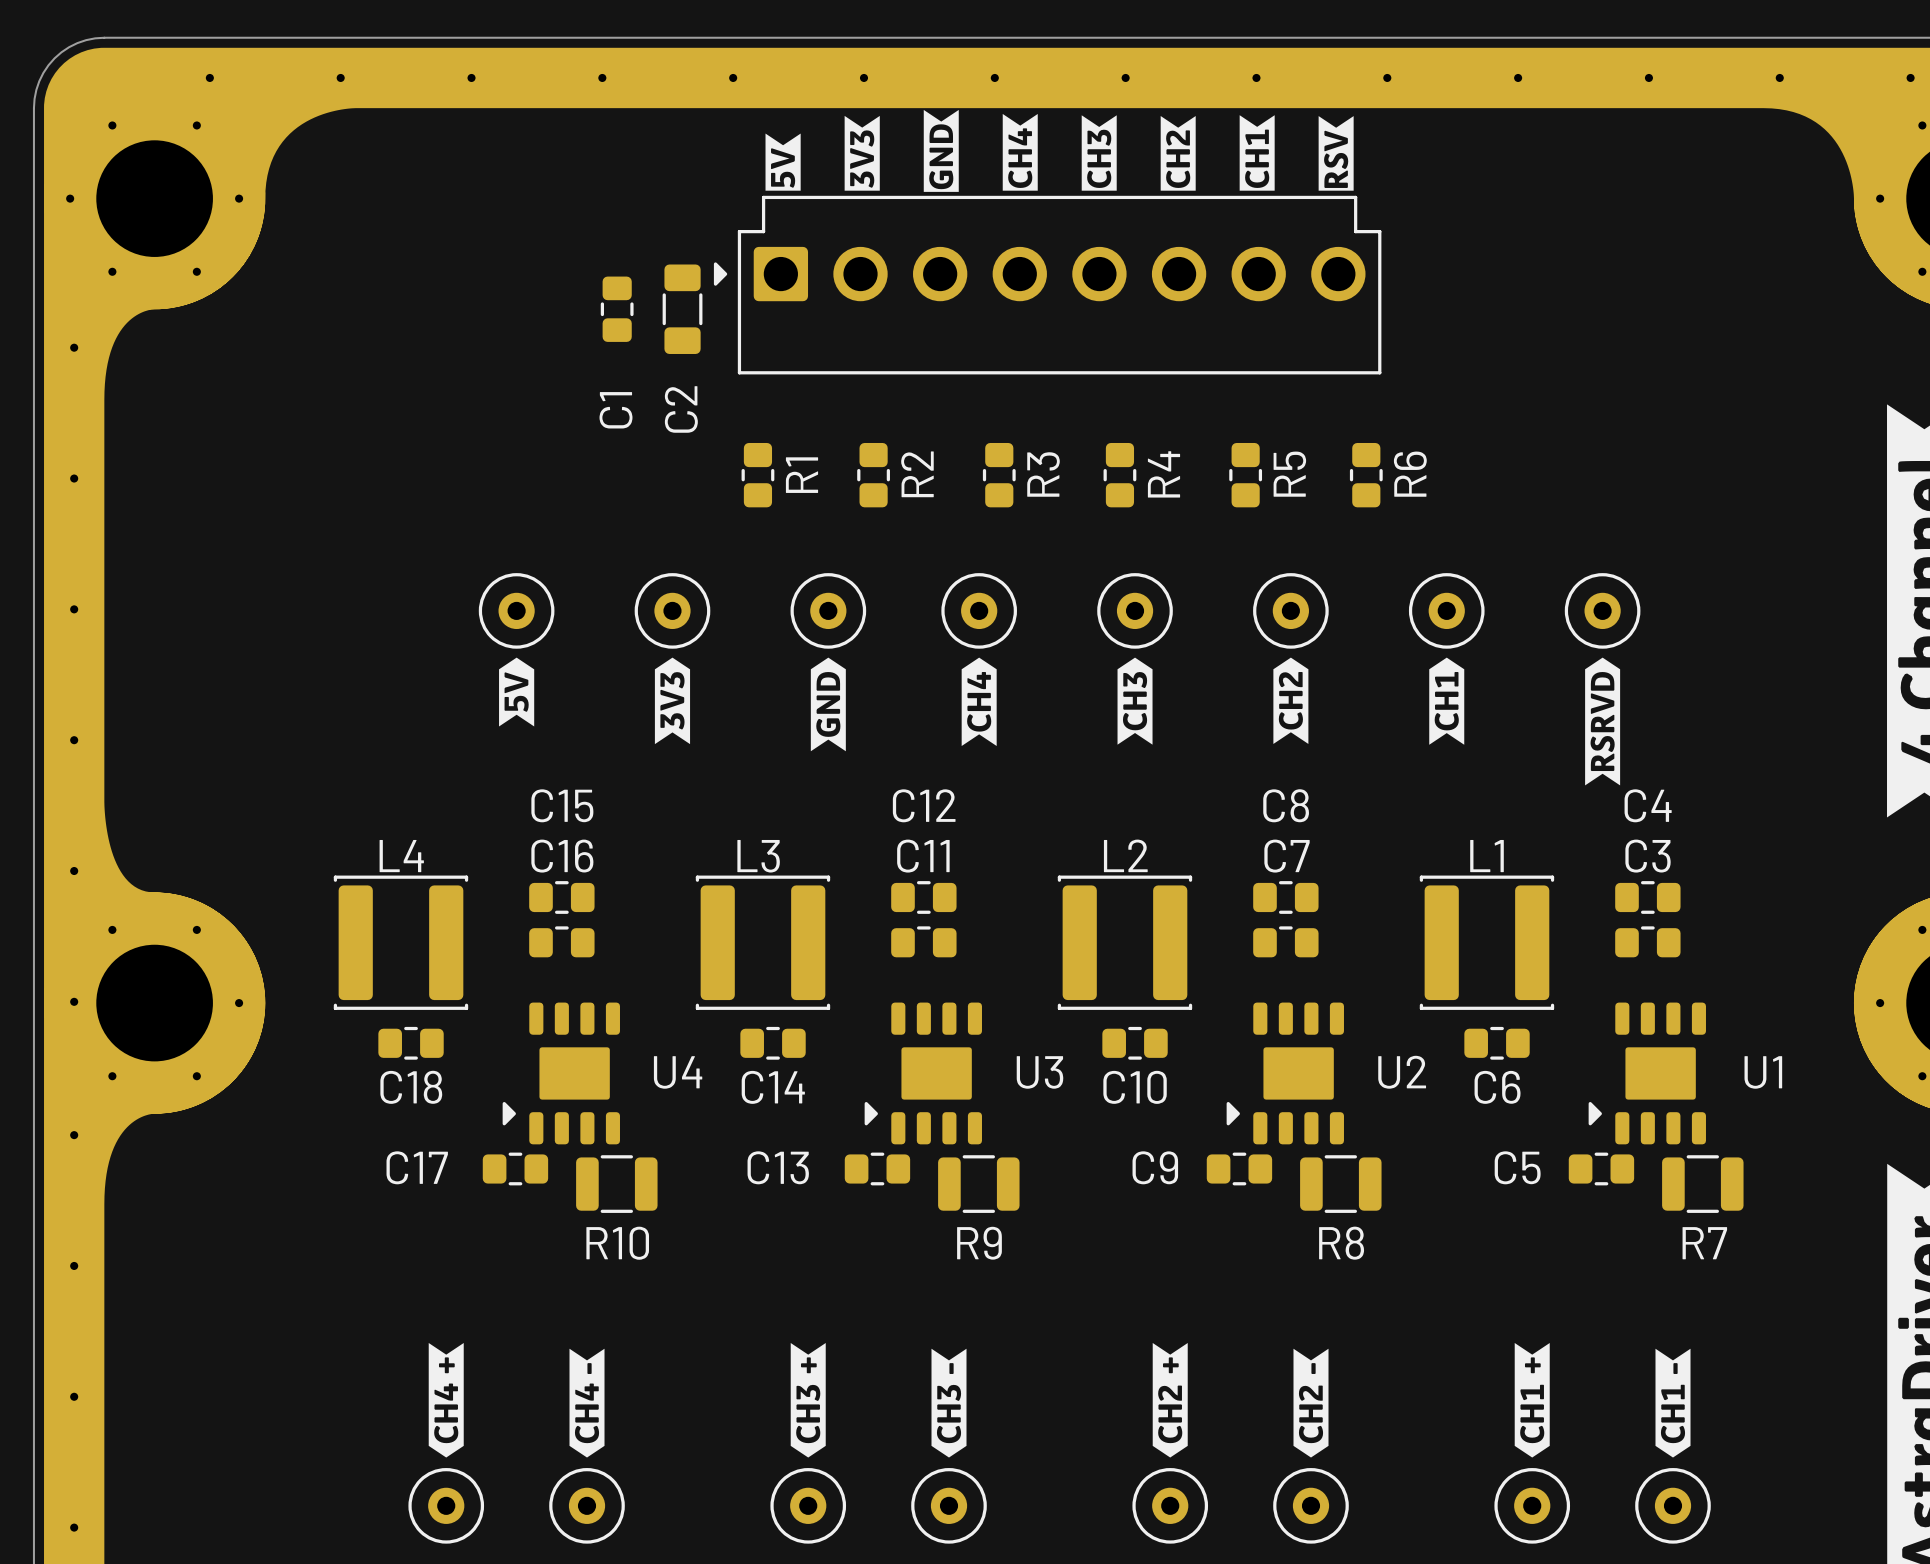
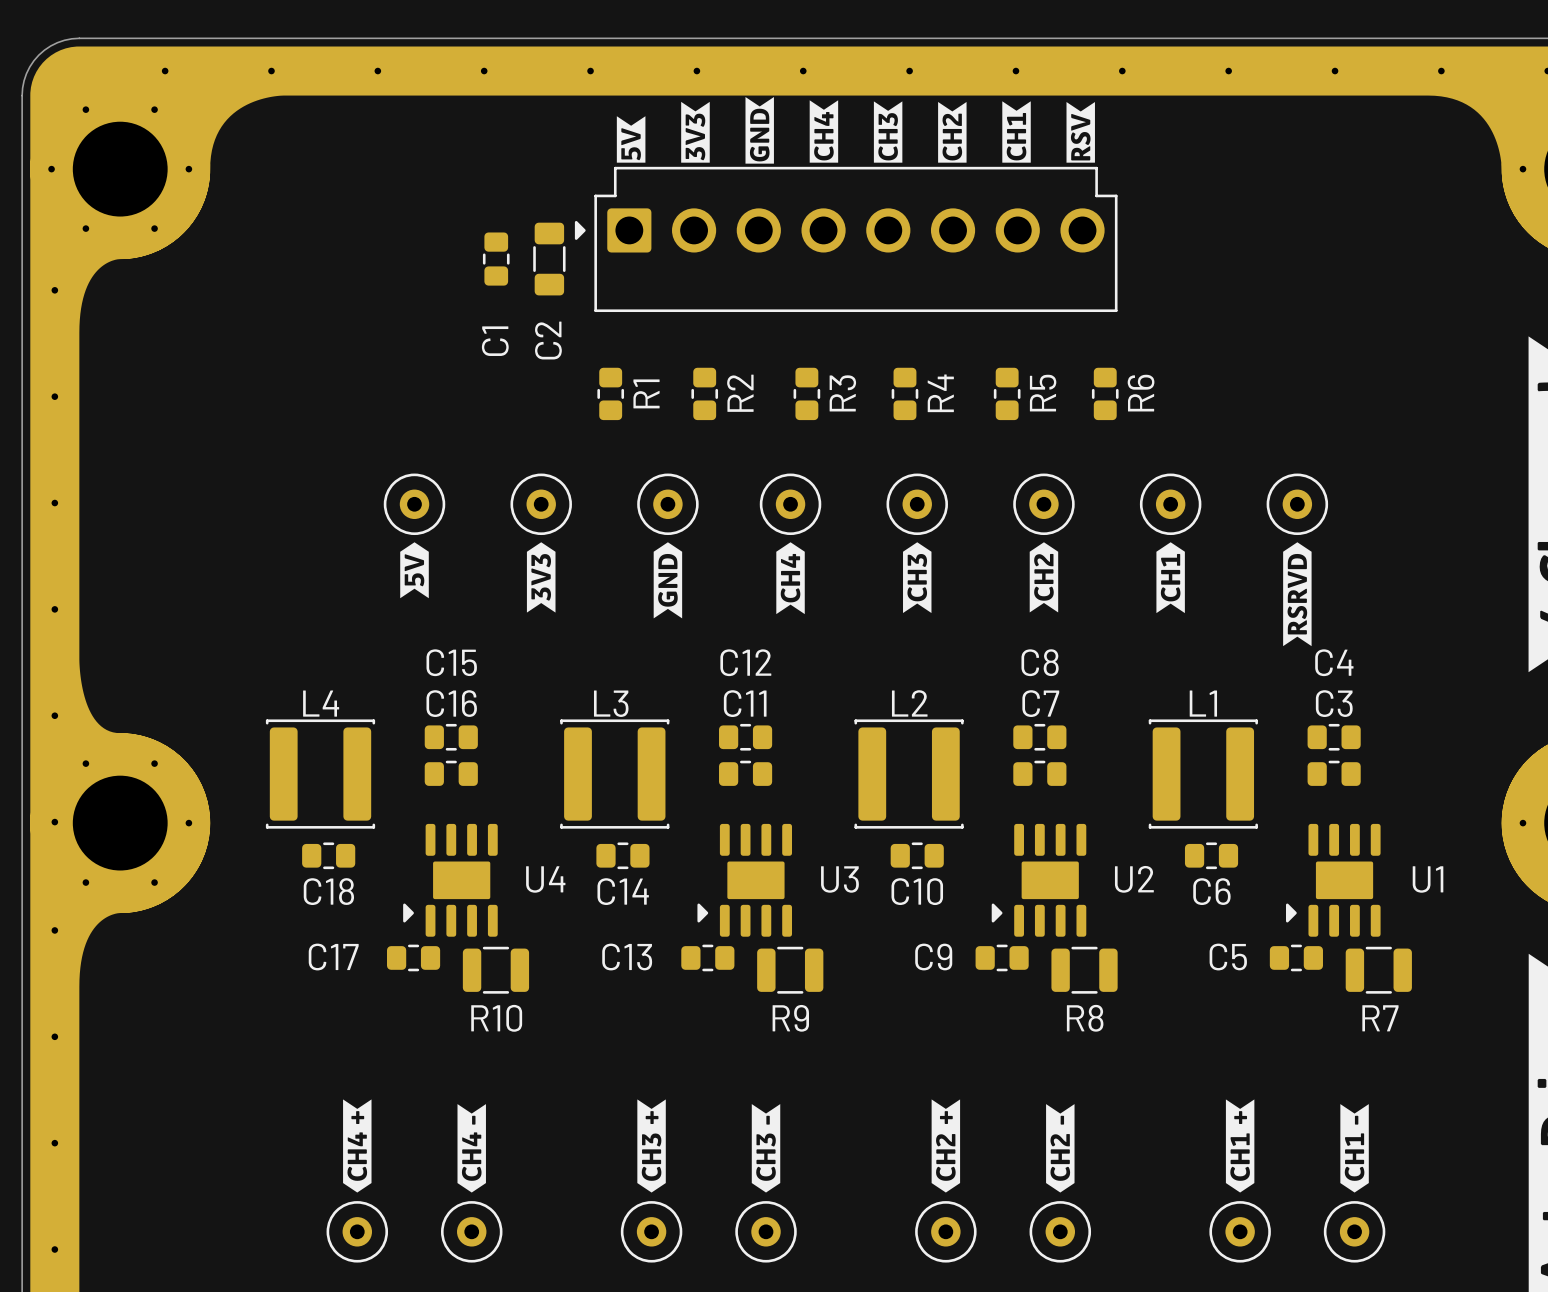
U4 footprint: [502, 1002, 620, 1145] -> [403, 823, 498, 937]
U3 footprint: [864, 1002, 982, 1145] -> [697, 823, 793, 937]
U2 footprint: [1226, 1002, 1344, 1145] -> [991, 823, 1087, 937]
U1 footprint: [1588, 1002, 1706, 1145] -> [1285, 823, 1381, 937]

